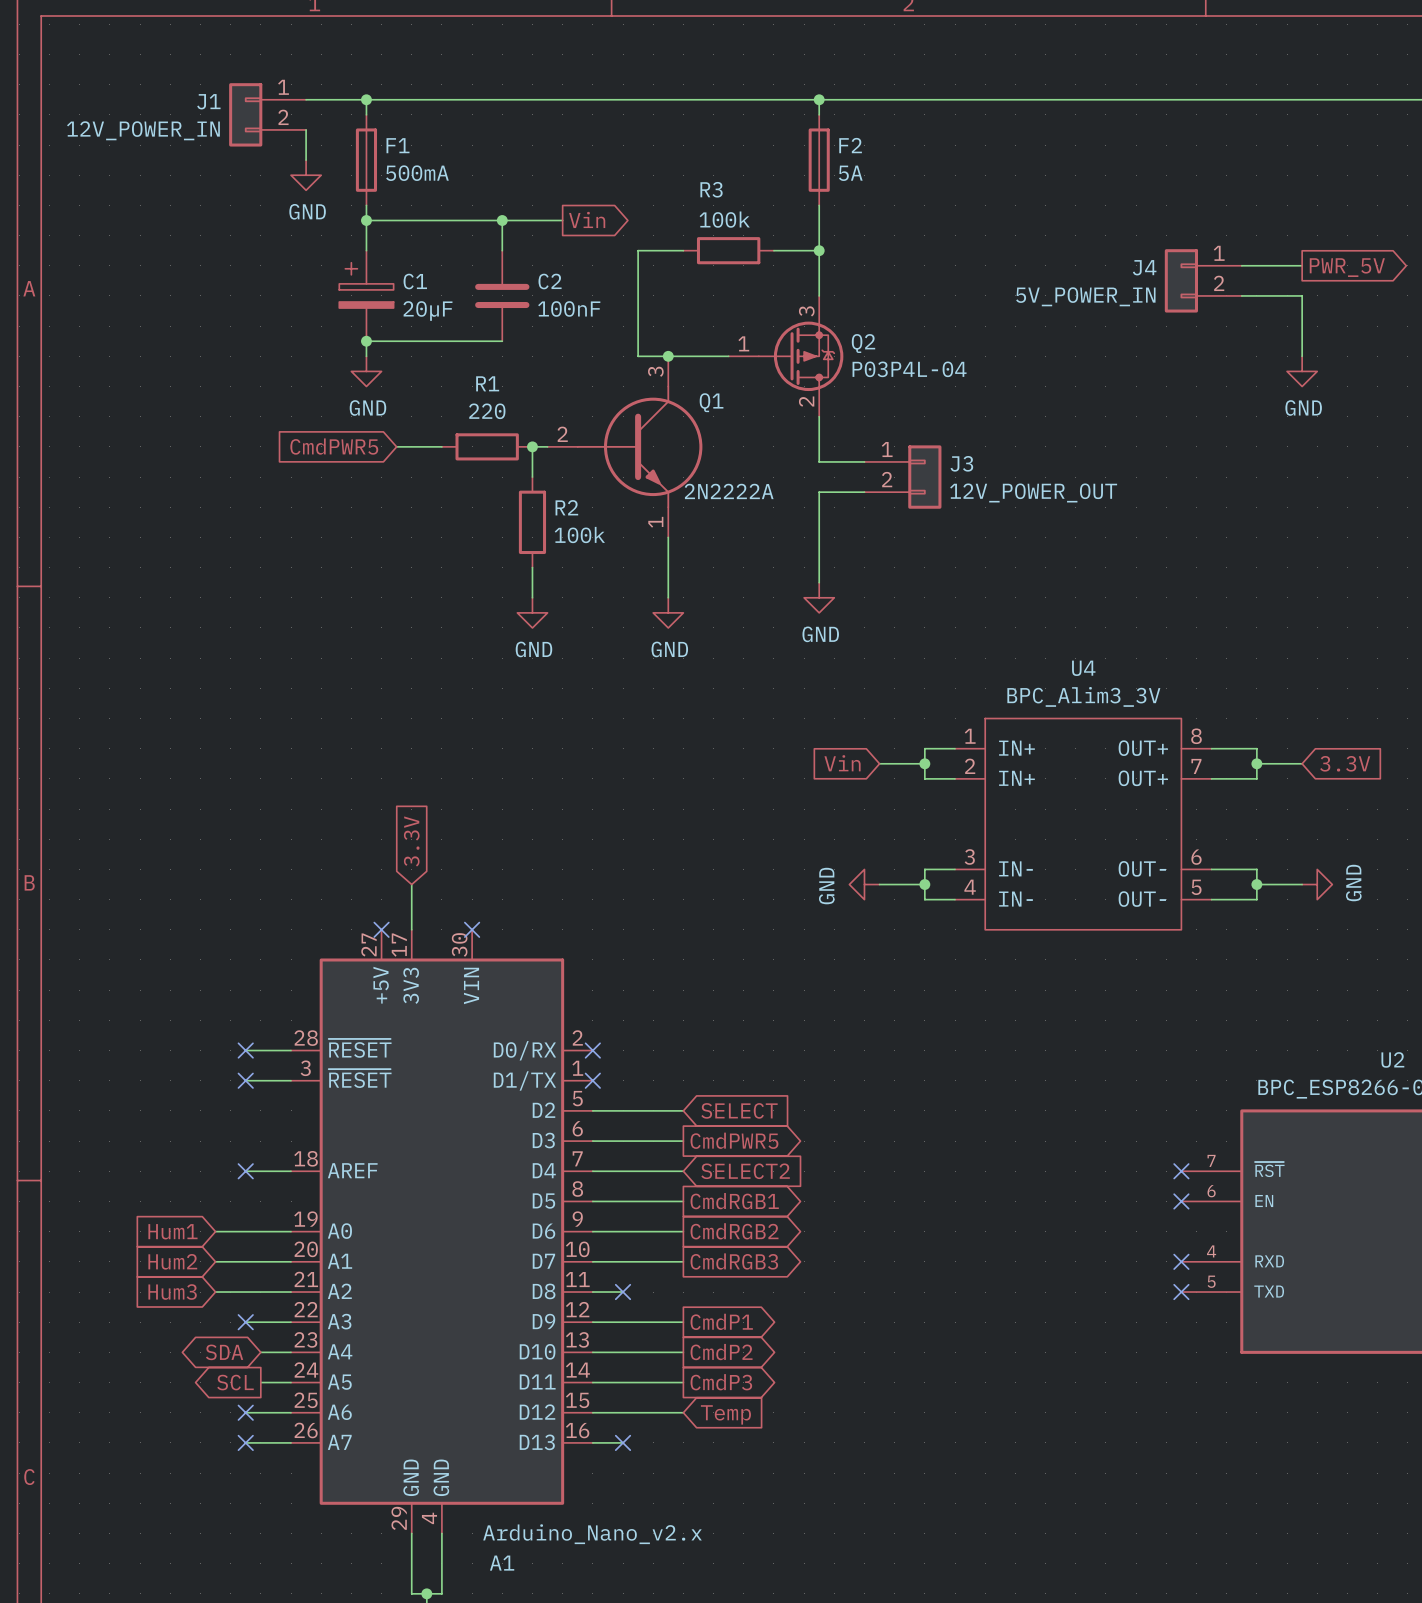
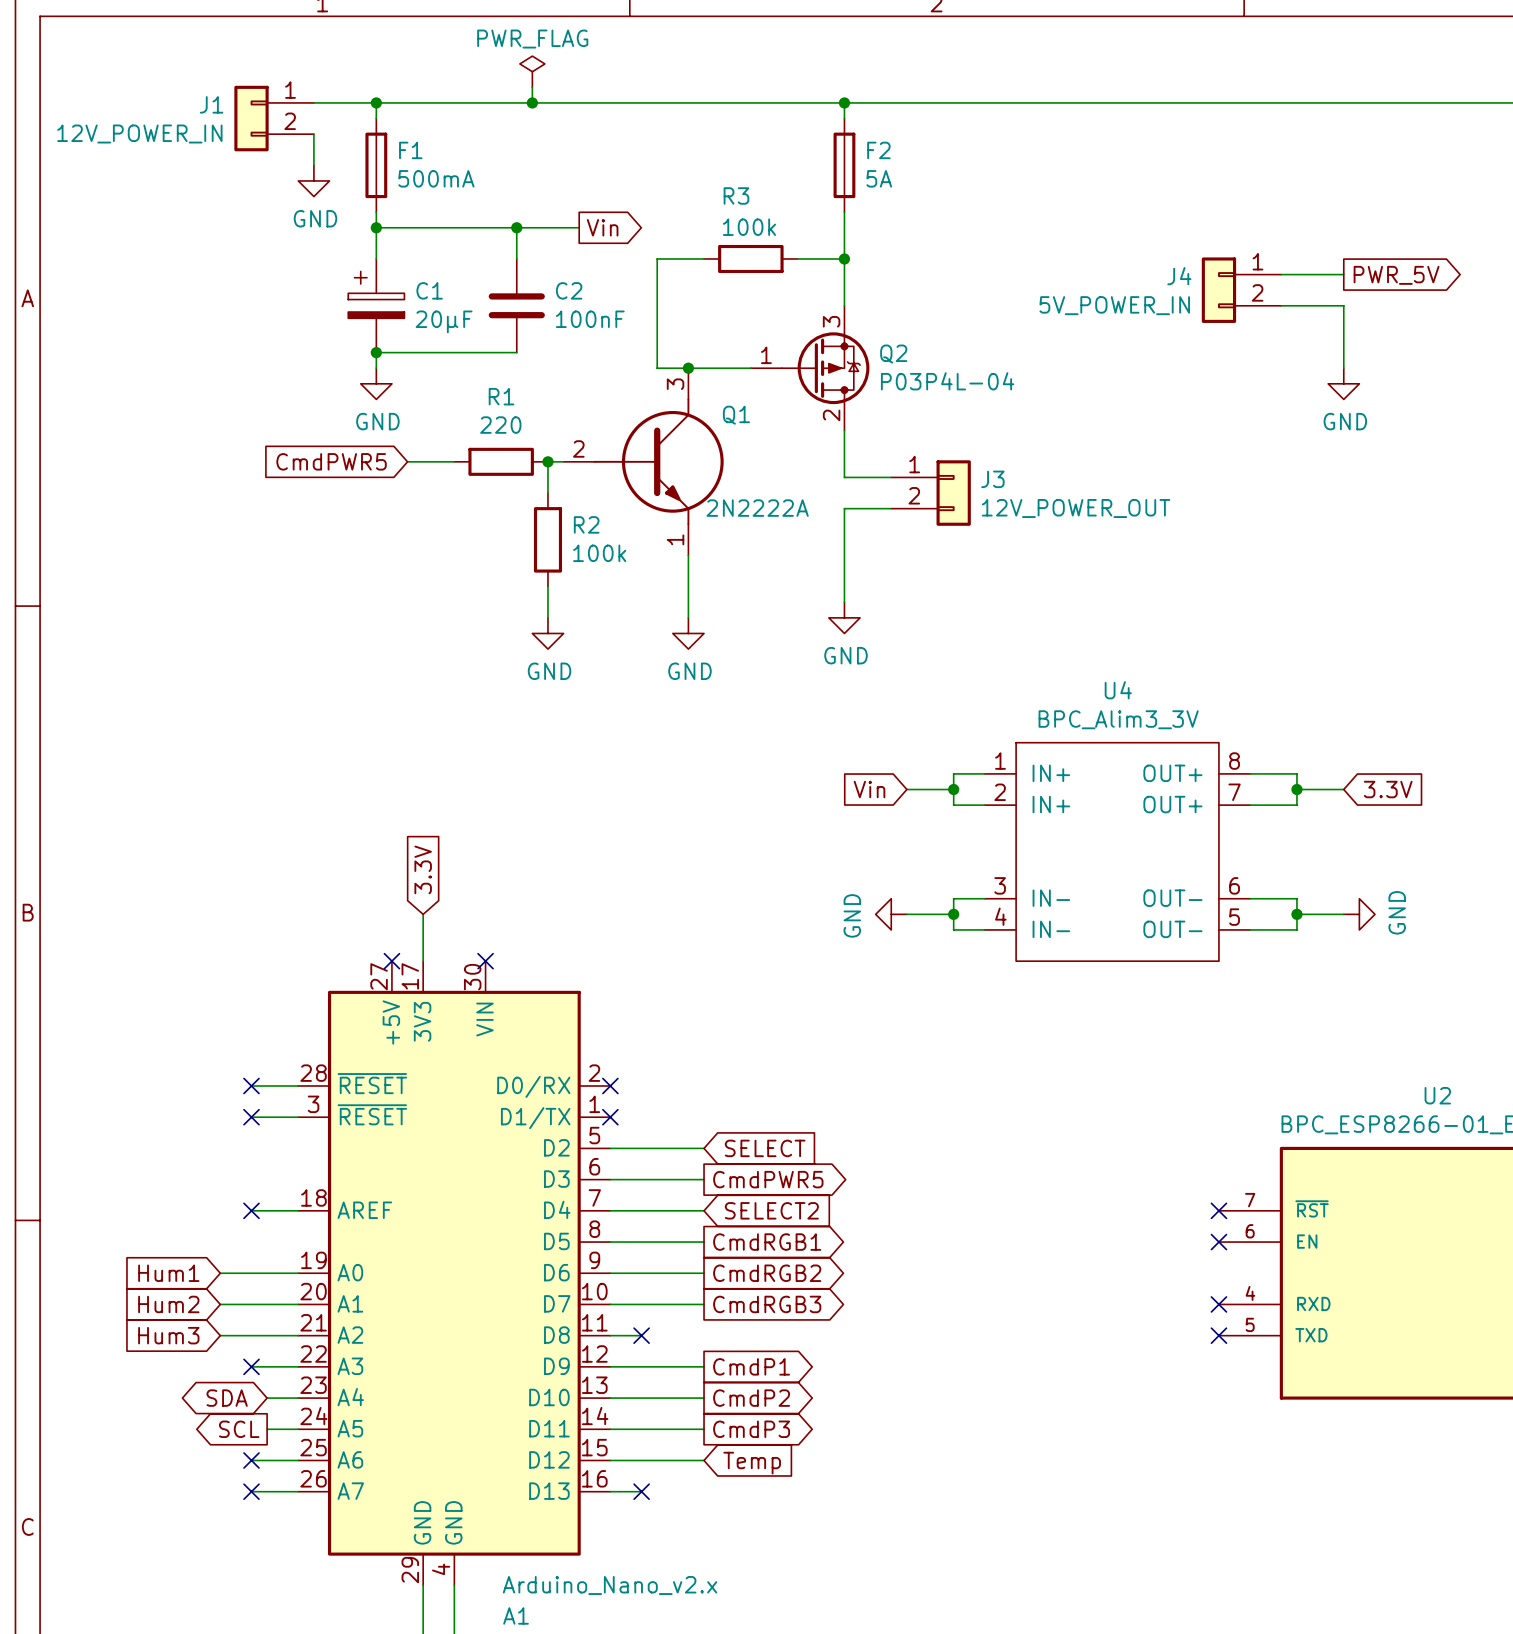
power symbol: none -> PWR_FLAG (532, 71)
wire: none -> (532, 87) (532, 102)
junction: none -> (532, 102)

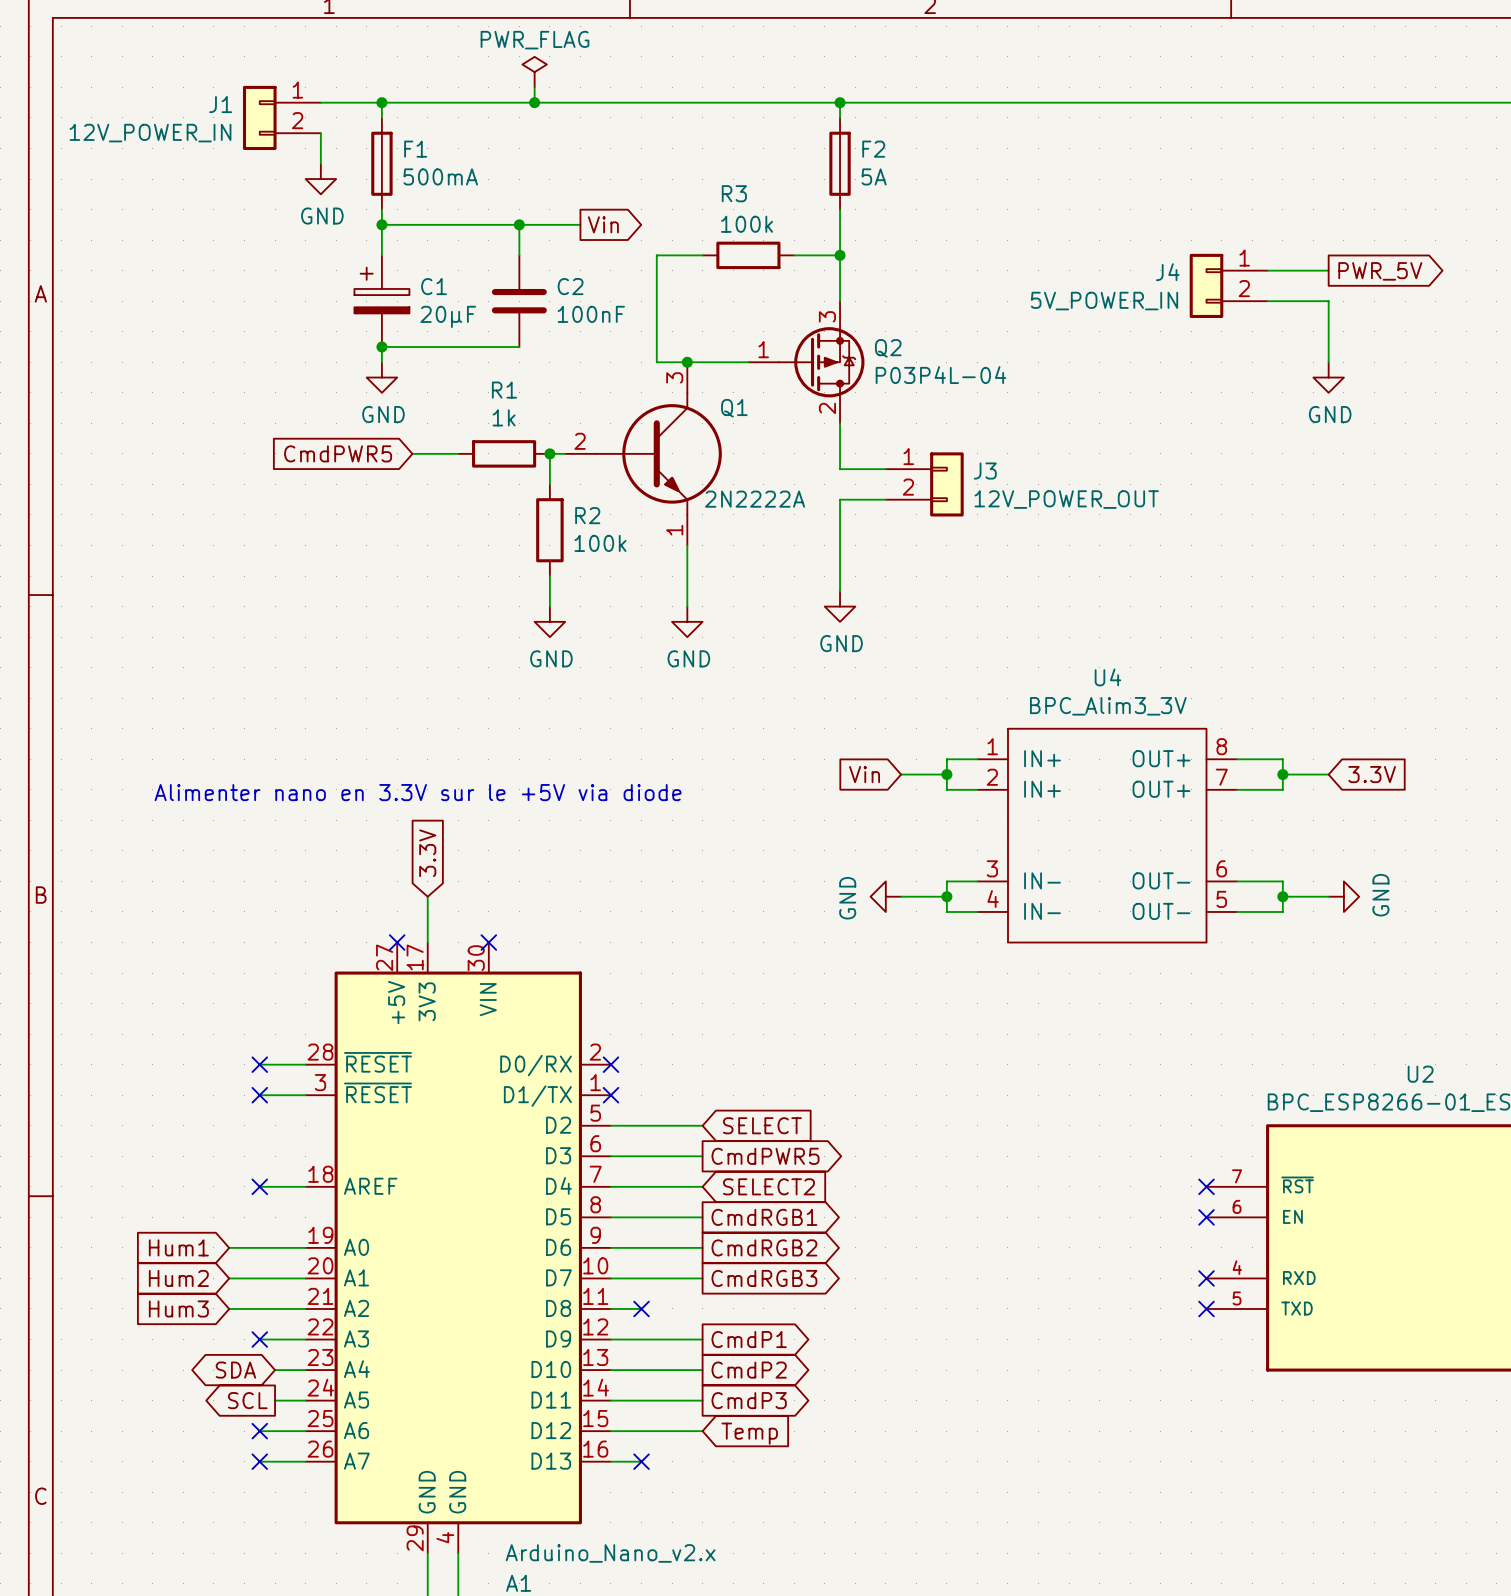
R1 value: 220 (500, 425) -> 1k (504, 417)
text: none -> Alimenter nano en 3.3V sur le +5V via diode (418, 792)

